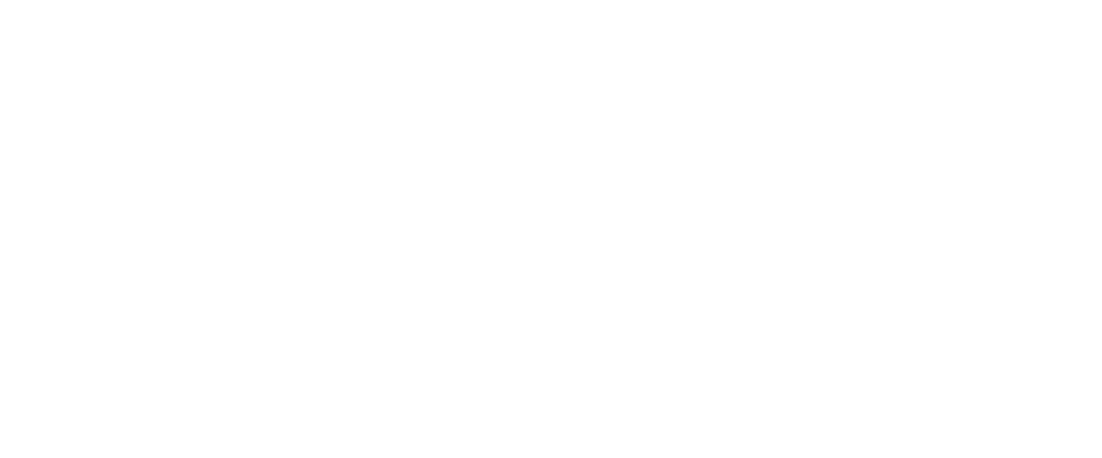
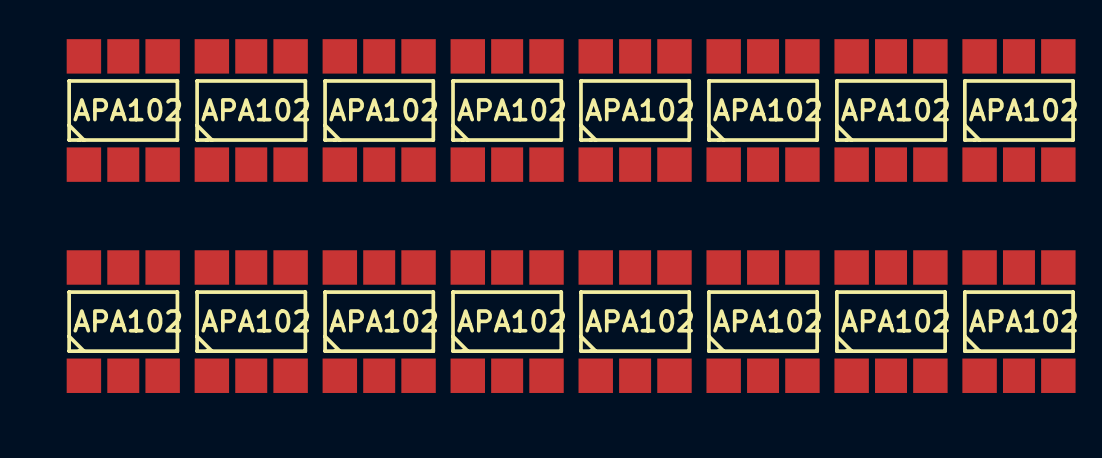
part: none -> APA102 (123, 110)
part: none -> APA102 (251, 110)
part: none -> APA102 (379, 110)
part: none -> APA102 (507, 110)
part: none -> APA102 (635, 110)
part: none -> APA102 (763, 110)
part: none -> APA102 (891, 110)
part: none -> APA102 (1018, 110)
part: none -> APA102 (123, 321)
part: none -> APA102 (251, 321)
part: none -> APA102 (379, 321)
part: none -> APA102 (507, 321)
part: none -> APA102 (635, 321)
part: none -> APA102 (763, 321)
part: none -> APA102 (891, 321)
part: none -> APA102 (1018, 321)

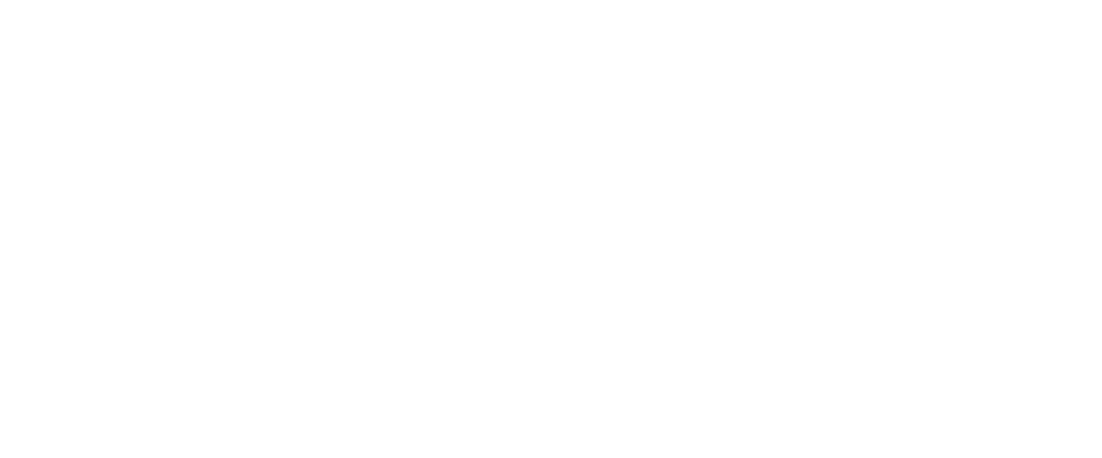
part: APA102 (123, 110) -> none
part: APA102 (251, 110) -> none
part: APA102 (379, 110) -> none
part: APA102 (507, 110) -> none
part: APA102 (635, 110) -> none
part: APA102 (763, 110) -> none
part: APA102 (891, 110) -> none
part: APA102 (1018, 110) -> none
part: APA102 (123, 321) -> none
part: APA102 (251, 321) -> none
part: APA102 (379, 321) -> none
part: APA102 (507, 321) -> none
part: APA102 (635, 321) -> none
part: APA102 (763, 321) -> none
part: APA102 (891, 321) -> none
part: APA102 (1018, 321) -> none

